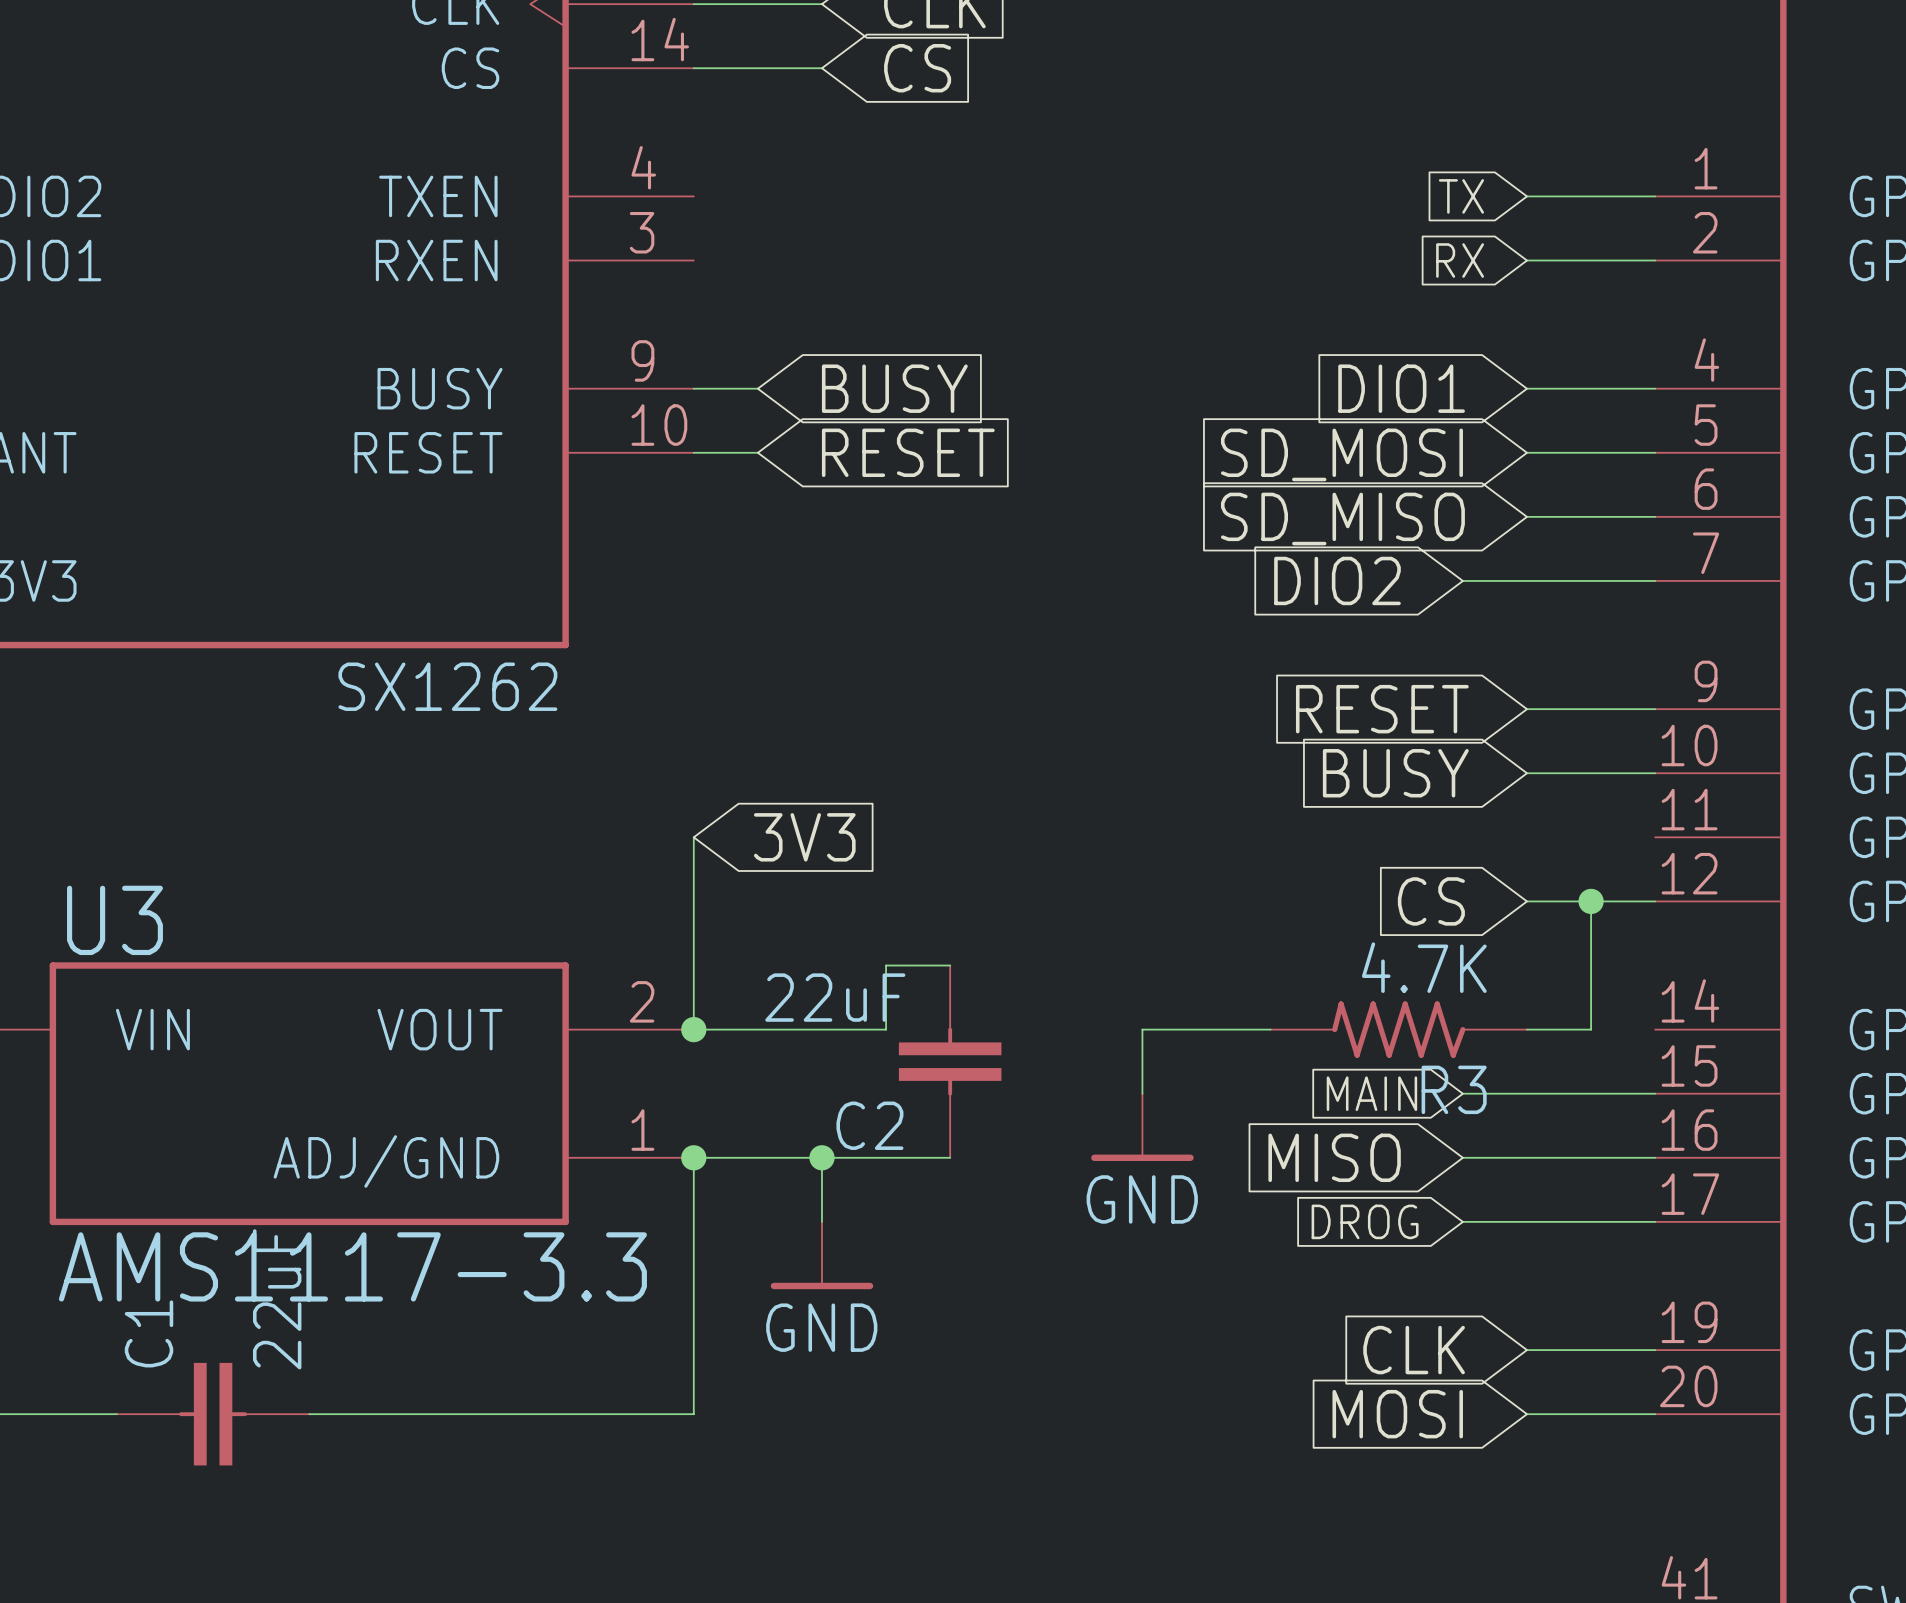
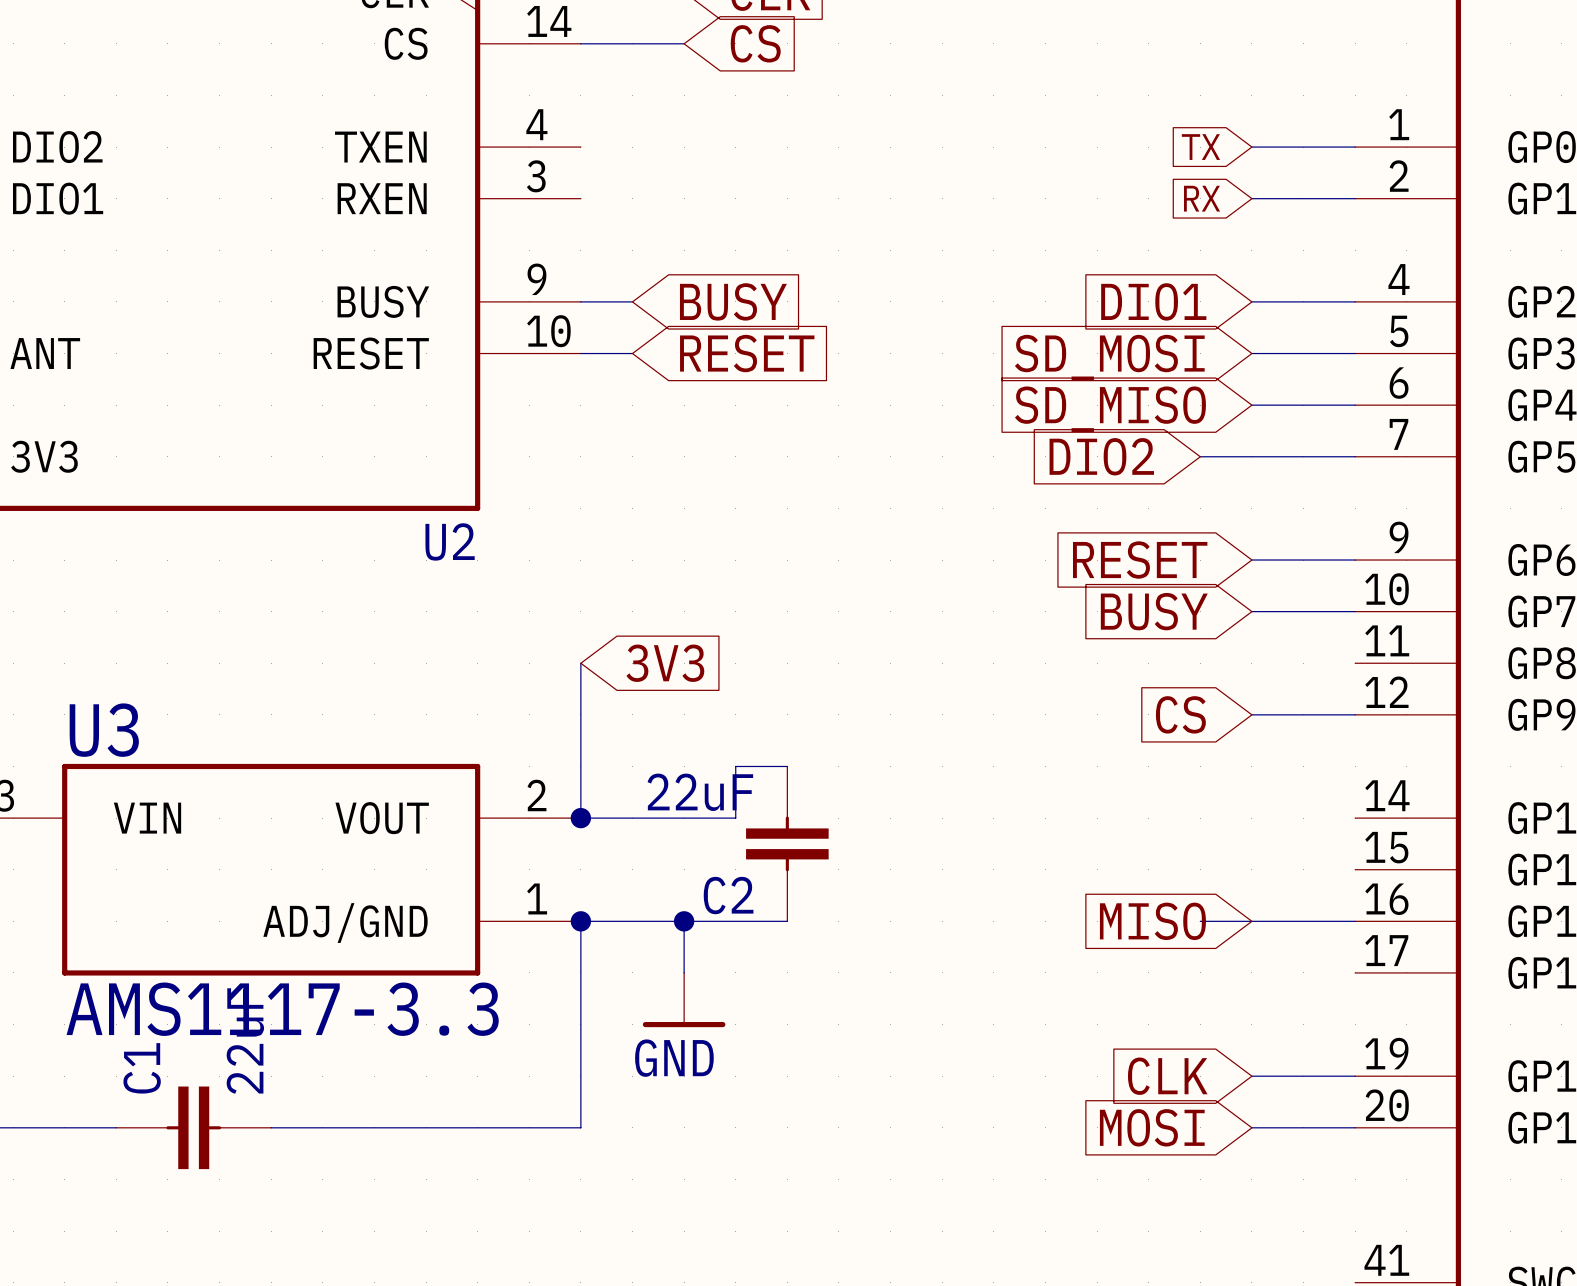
SX1262 name: SX1262 (447, 686) -> U2 (450, 541)
wire: (1591, 901) (1591, 1029) (1526, 1029) -> none
junction: (1591, 901) -> none
wire: (1270, 1029) (1142, 1029) (1142, 1093) -> none
R3: 4.7K (1398, 1029) -> none
global label: MAIN (1371, 1093) -> none
wire: (1462, 1093) (1655, 1093) -> none
power symbol: GND (1142, 1127) -> none
global label position: MISO (1334, 1157) -> MISO (1152, 921)
global label: DROG (1365, 1221) -> none
wire: (1462, 1221) (1655, 1221) -> none

